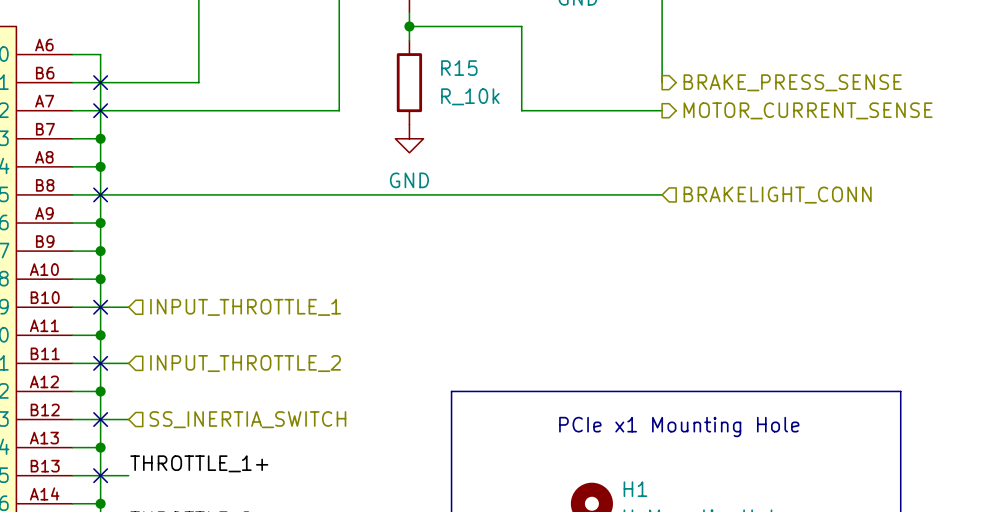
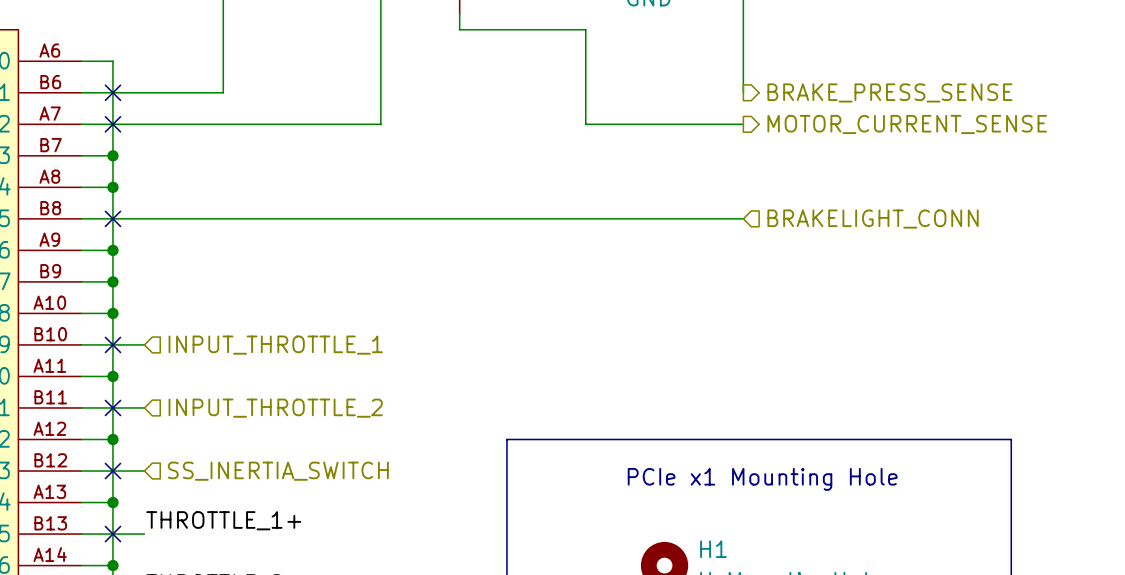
wire: (409, 26) (409, 40) -> none
junction: (409, 26) -> none
R15: R_10k (409, 82) -> none
power symbol: GND (409, 138) -> none

